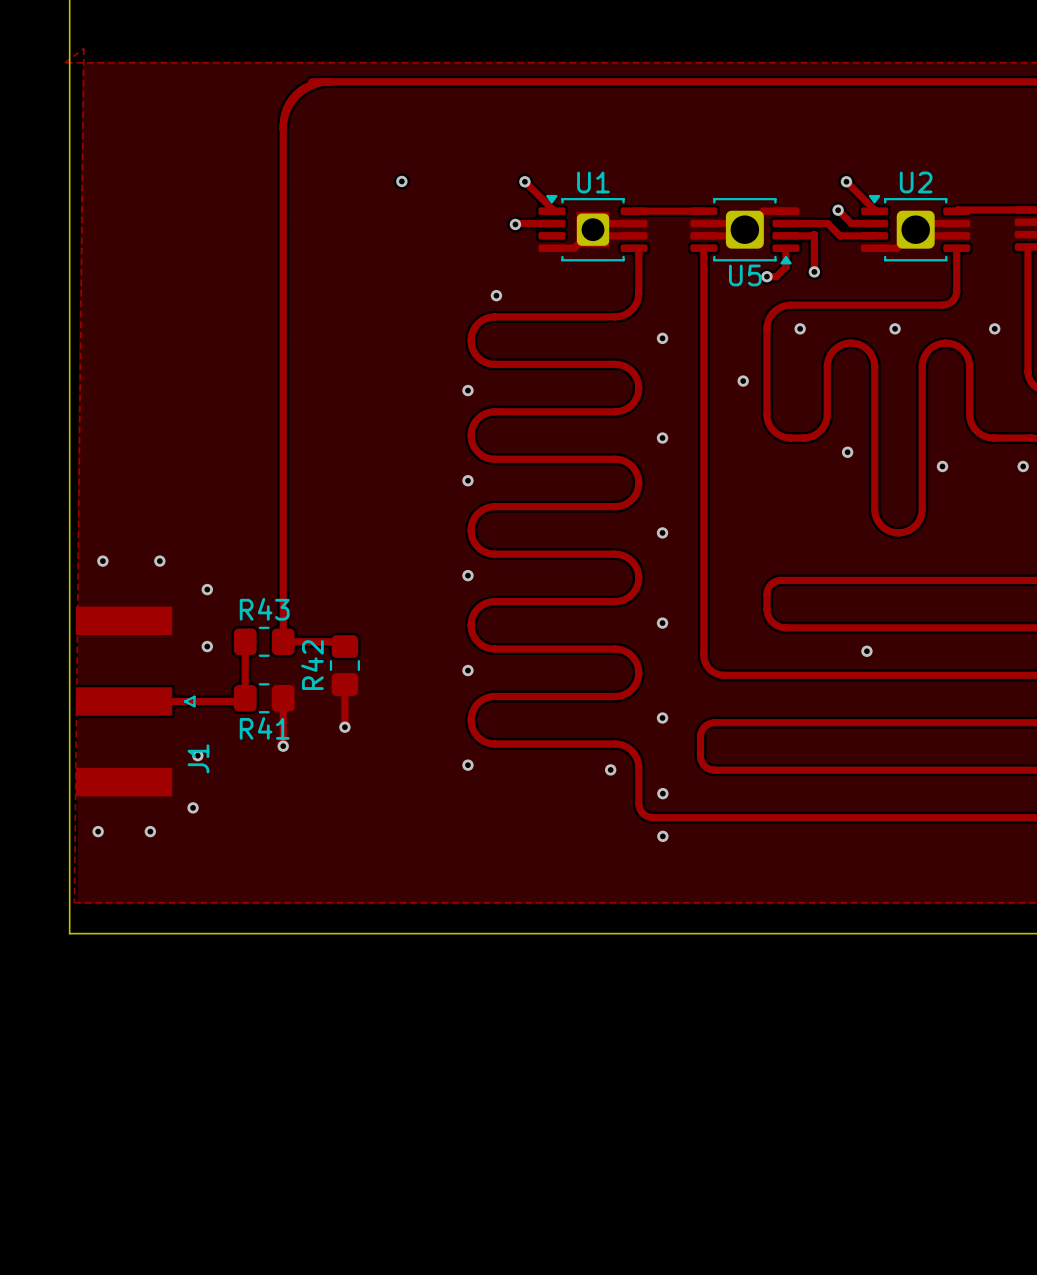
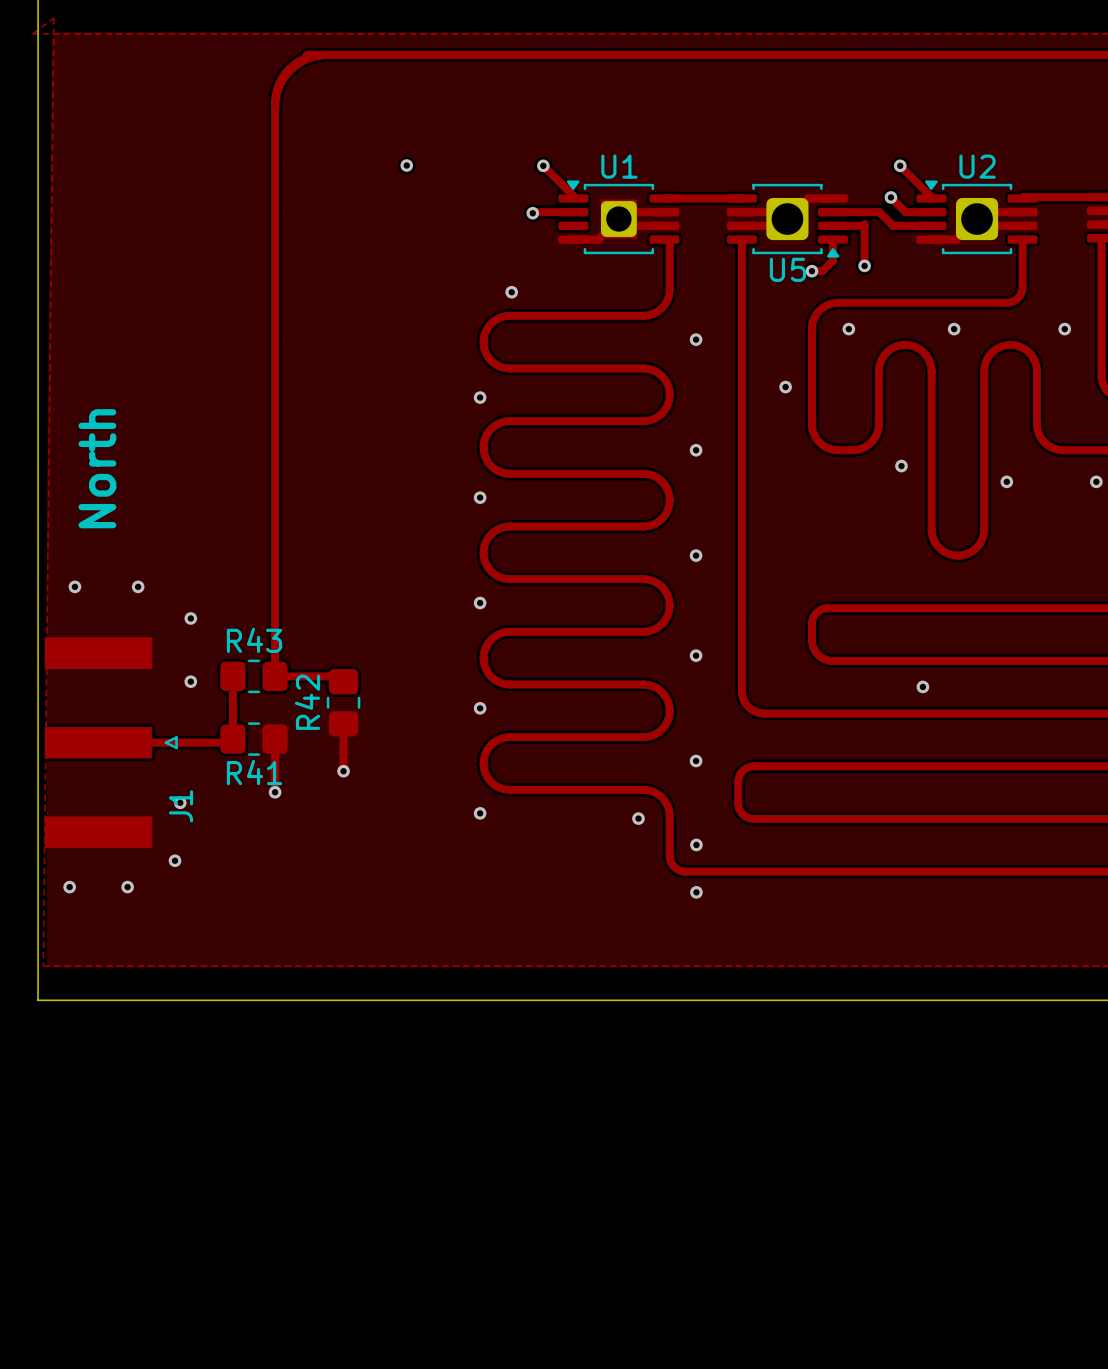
text: none -> North (97, 468)

